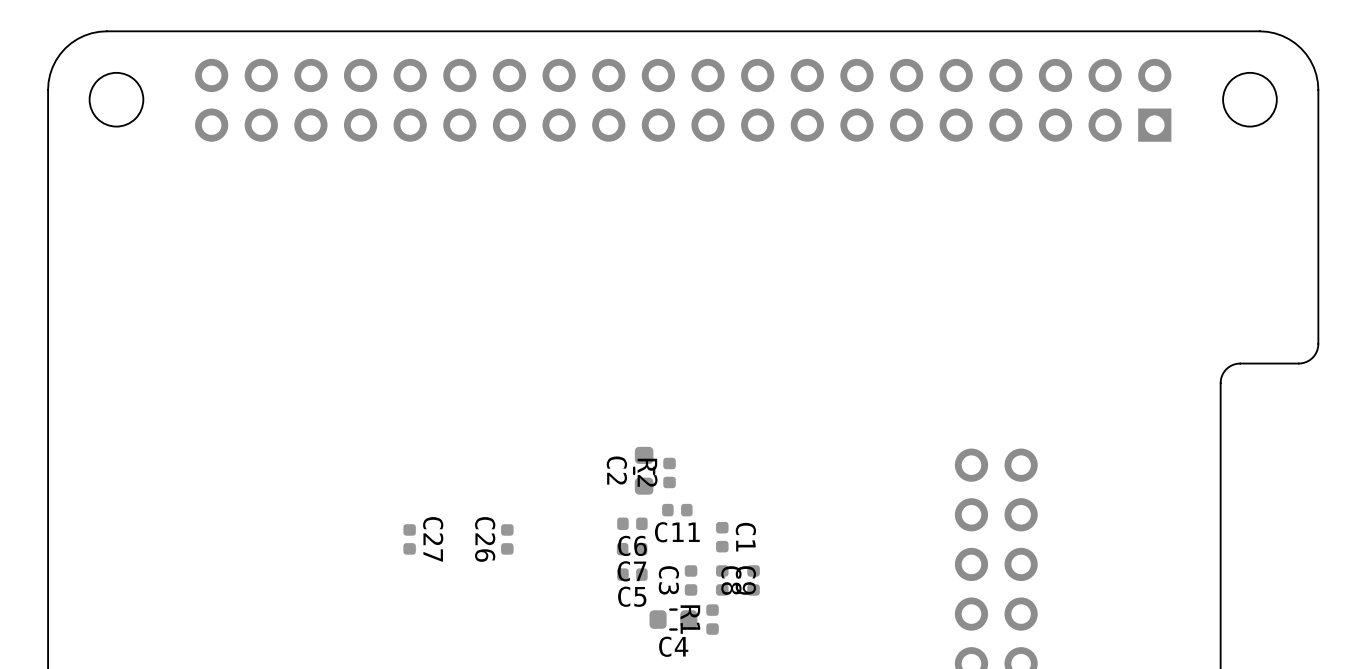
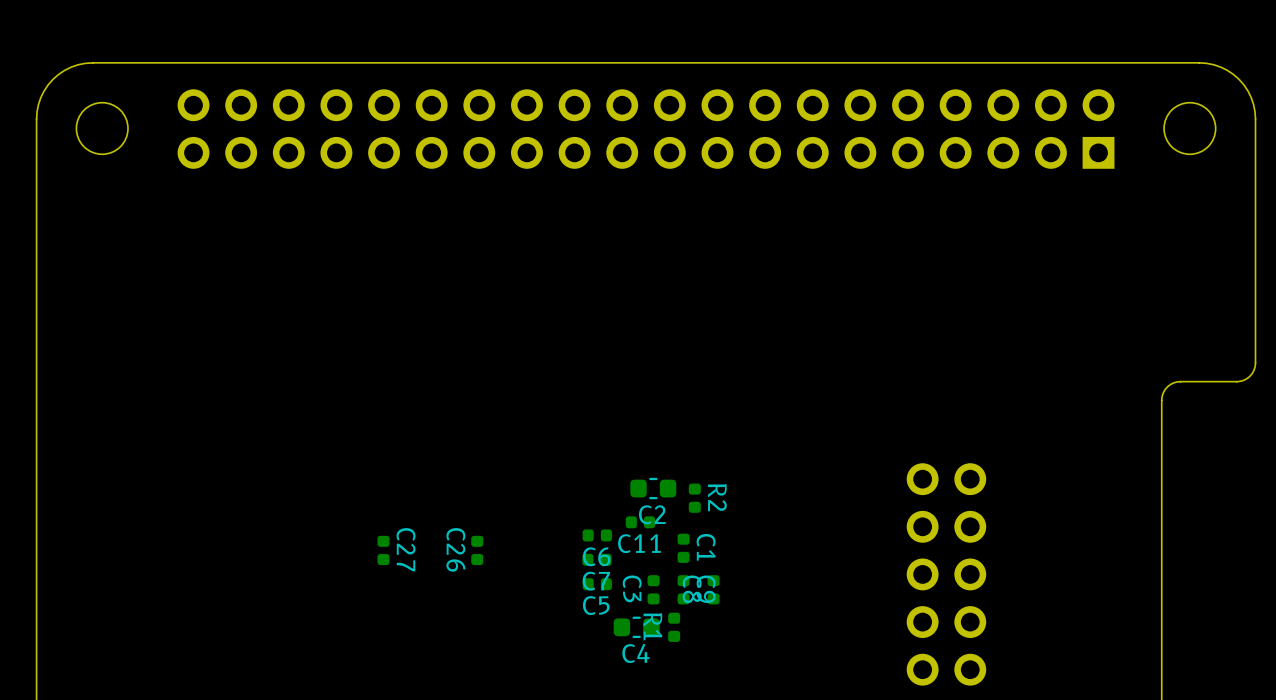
C2 name position: C2 (616, 470) -> C2 (652, 514)
C2 rotation: 0° (644, 470) -> 90° clockwise (653, 488)
C2 position: (644, 470) -> (653, 488)
R2 name position: R2 (647, 472) -> R2 (717, 497)
R2 position: (669, 472) -> (694, 498)

